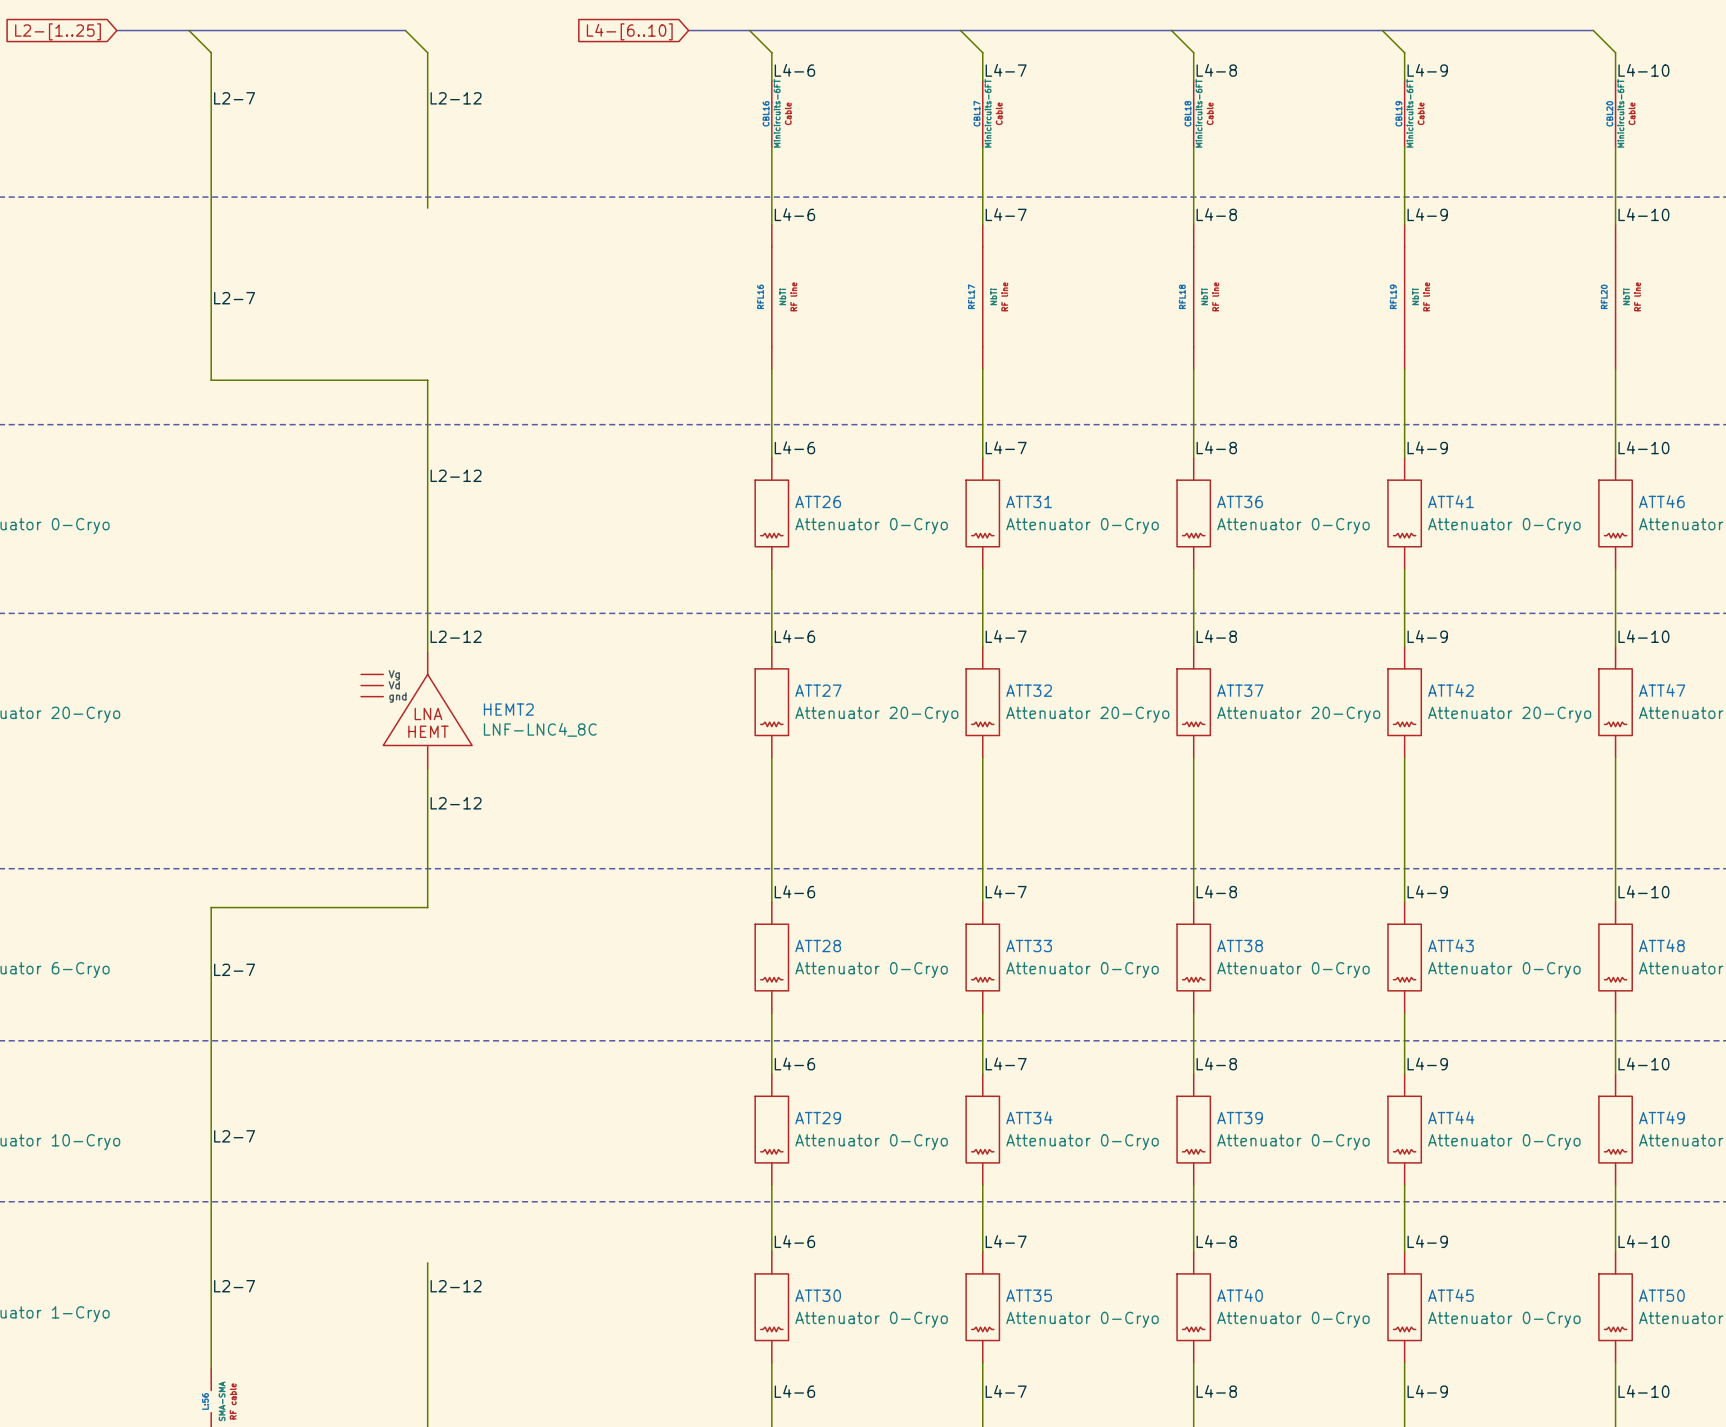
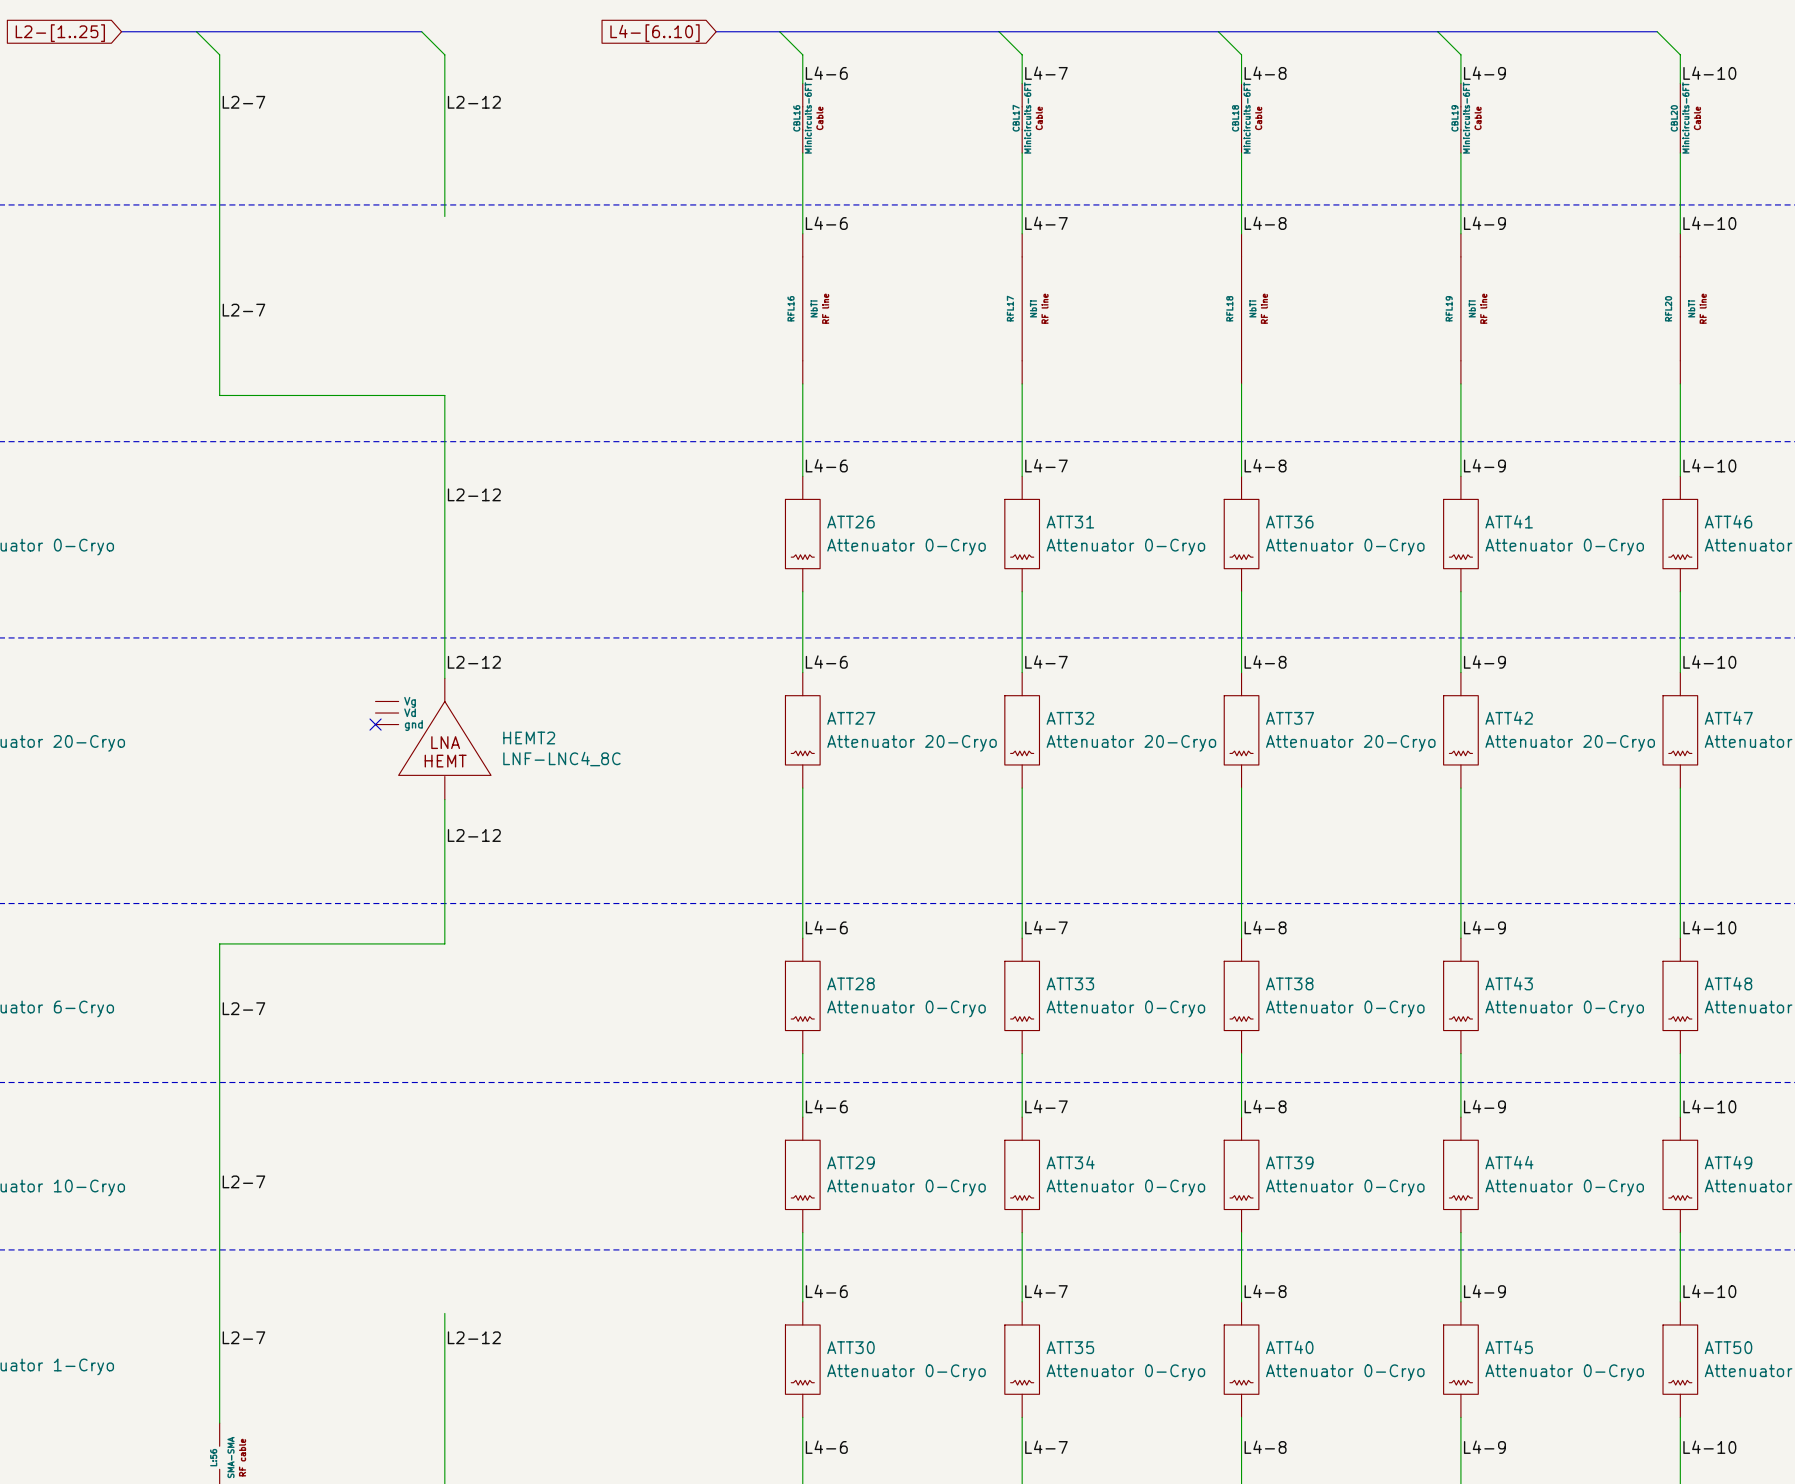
no-connect mark: none -> (375, 724)

